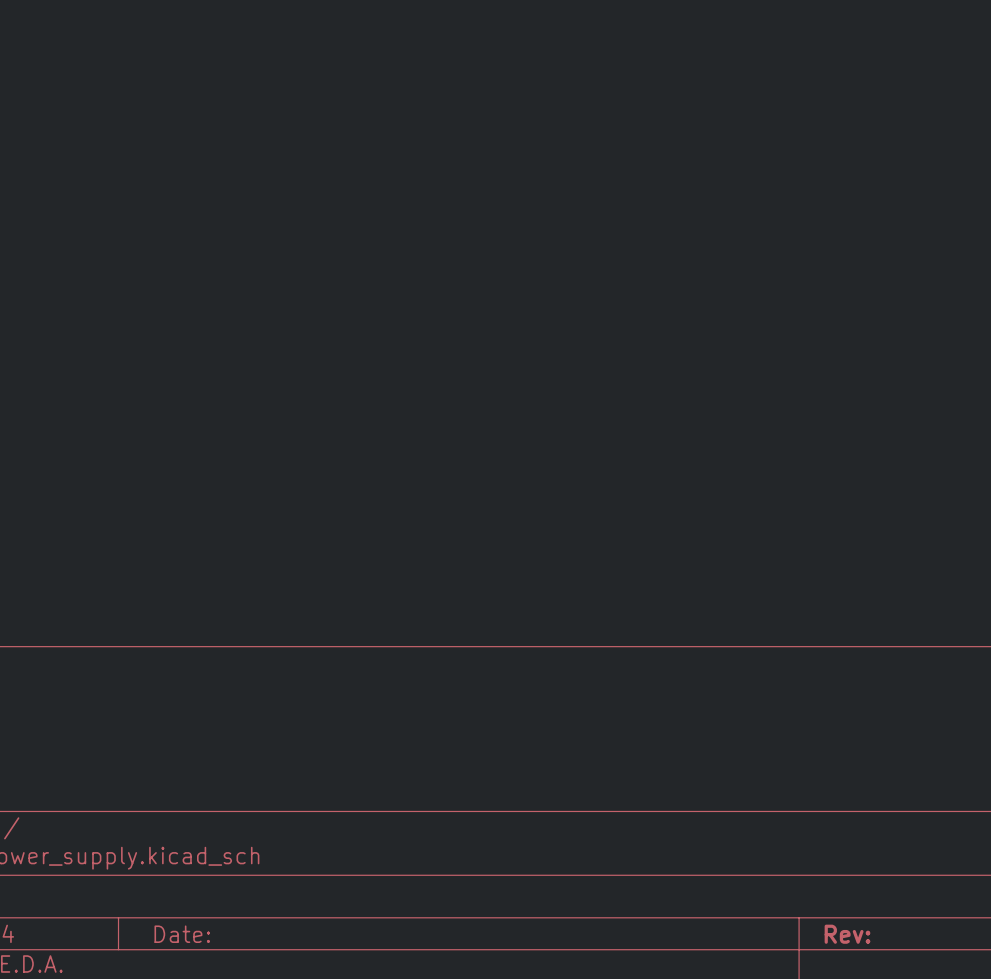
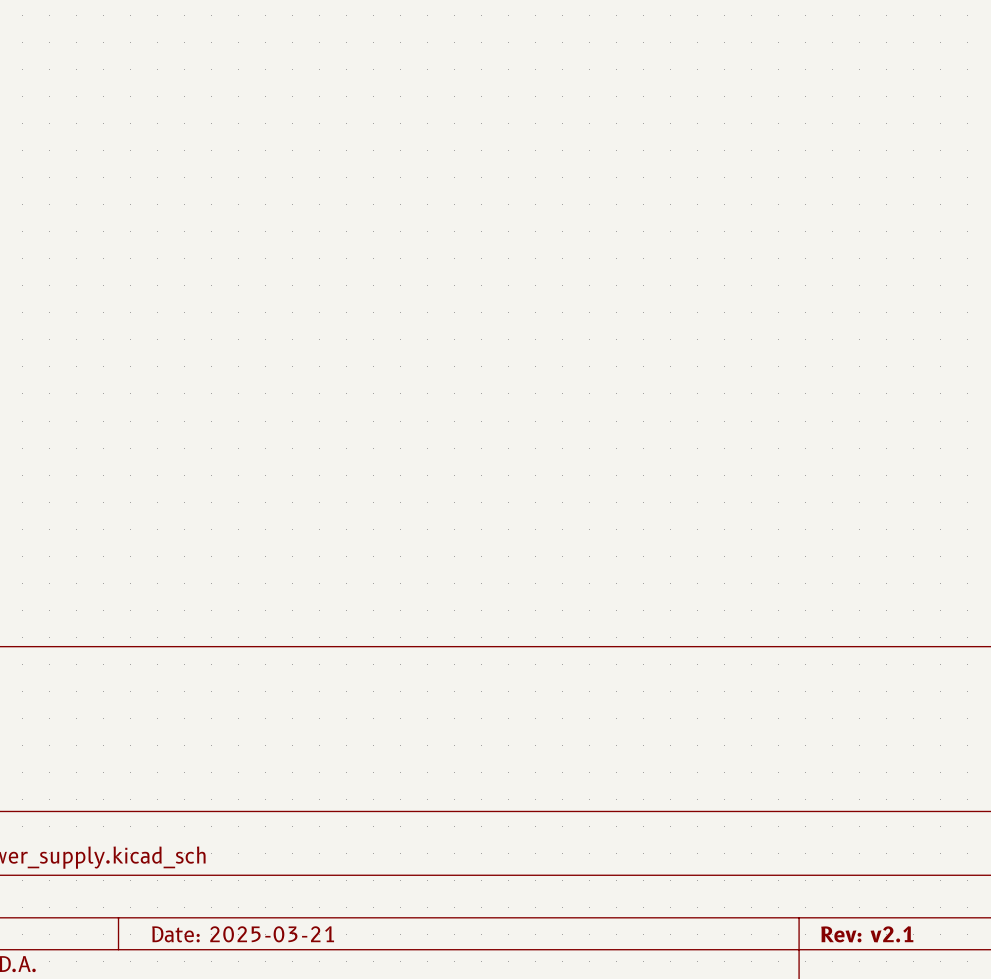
title block: Date: (182, 934) -> Date: 2025-03-21 (243, 934)
title block: Rev: (847, 934) -> Rev: v2.1 (867, 934)

